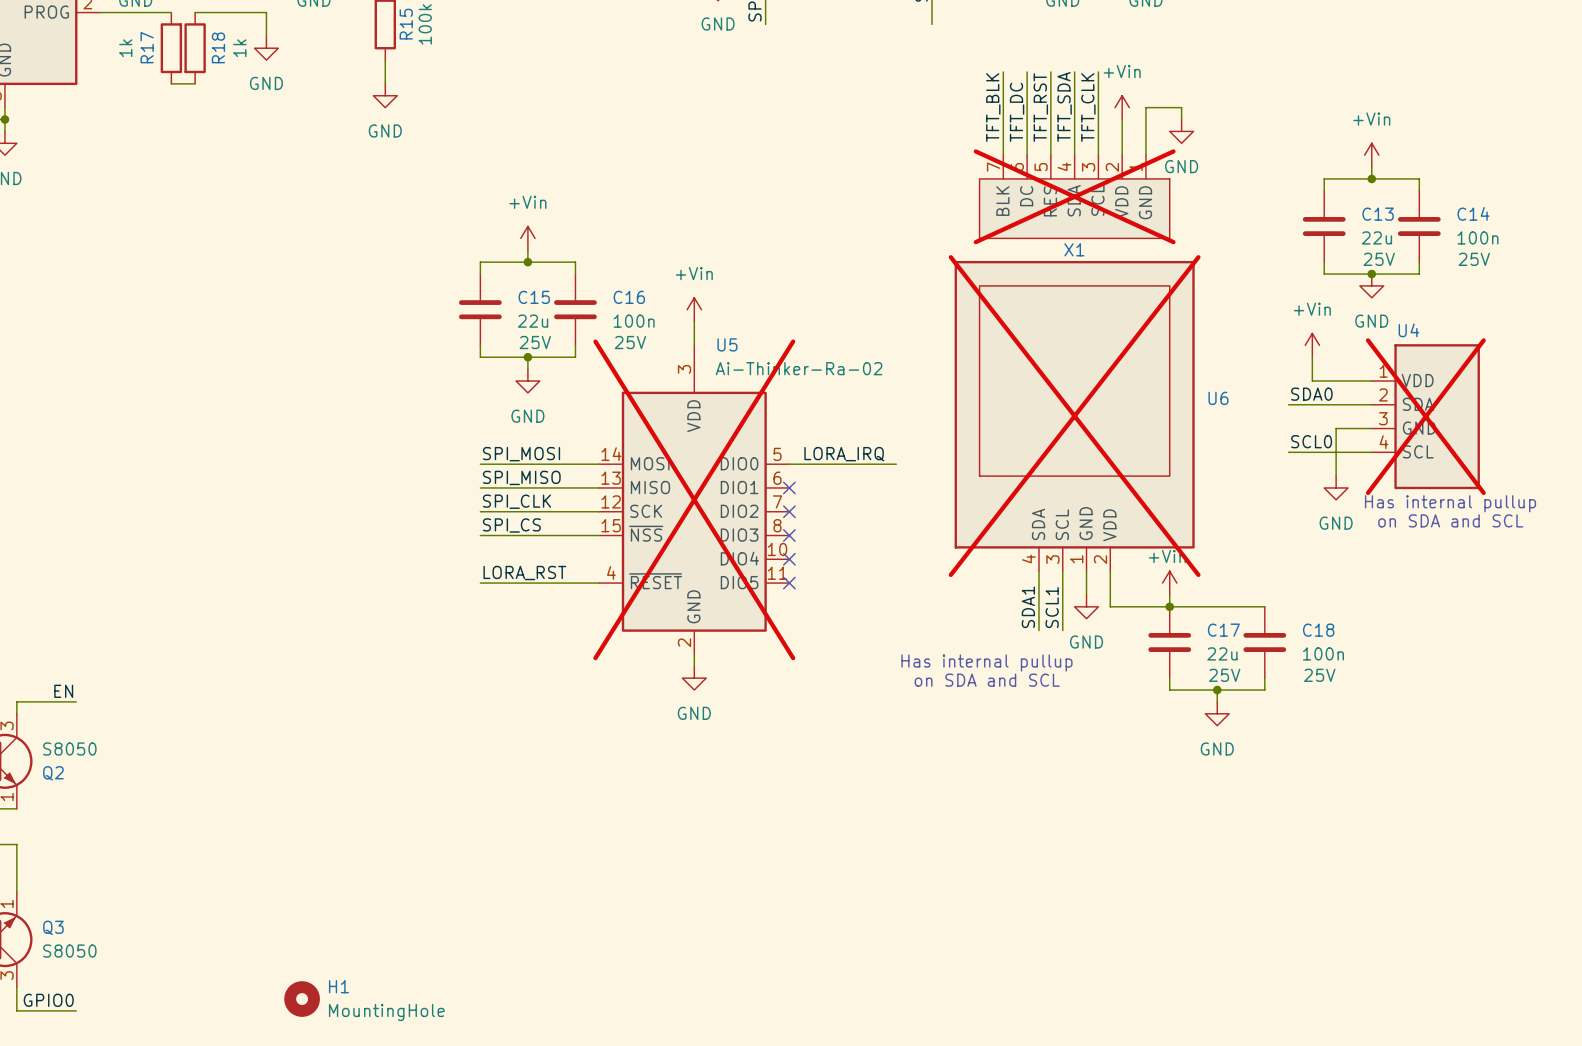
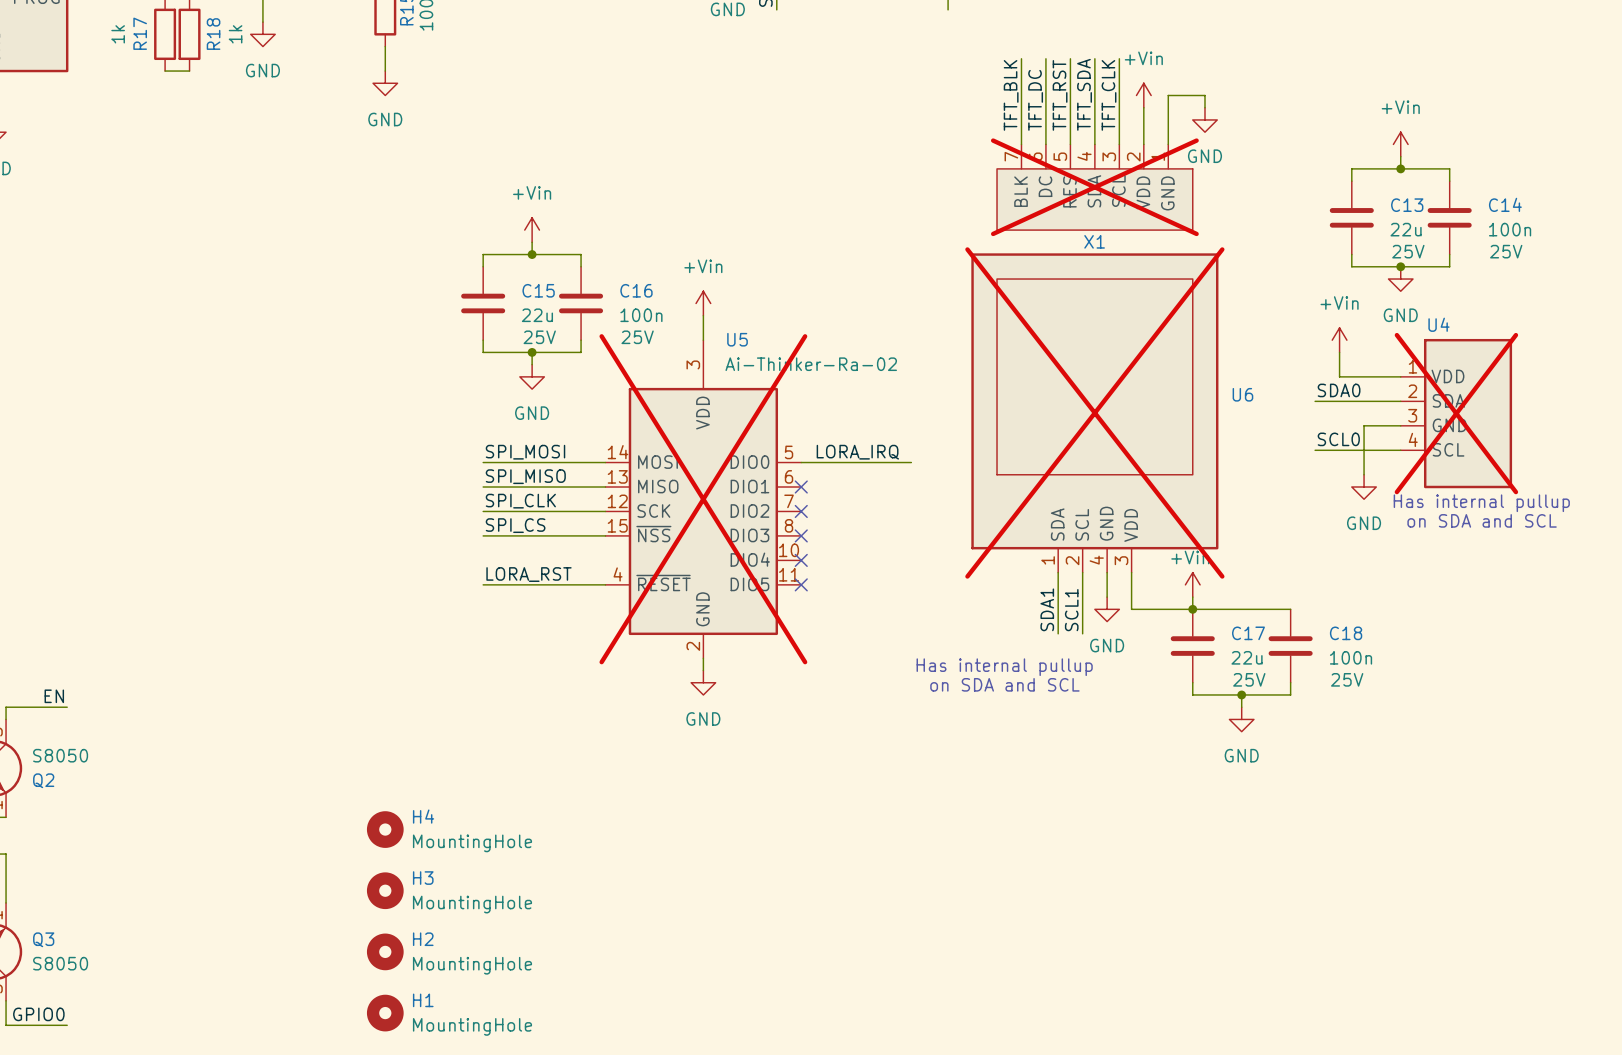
U6 pin number: 4 (1028, 559) -> 1 (1048, 560)
U6 pin number: 3 (1052, 559) -> 2 (1072, 560)
U6 pin number: 1 (1076, 559) -> 4 (1096, 560)
U6 pin number: 2 (1100, 559) -> 3 (1121, 560)
H4: none -> MountingHole (385, 829)
H3: none -> MountingHole (385, 890)
H2: none -> MountingHole (385, 951)
H1 position: (302, 999) -> (385, 1013)

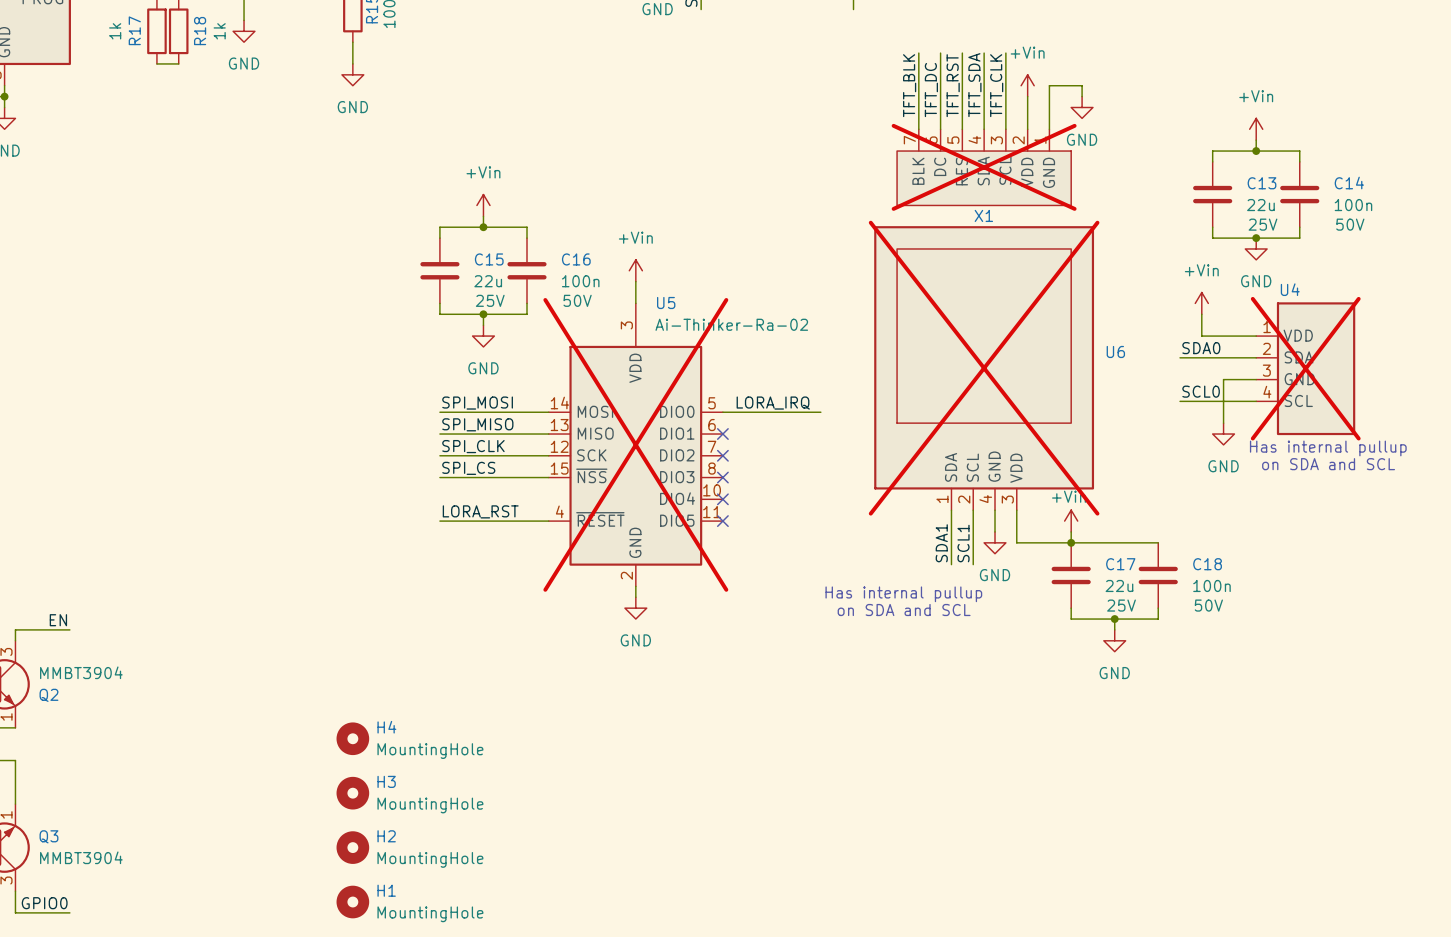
C14 text: 25V (1506, 251) -> 50V (1350, 224)
C16 text: 25V (637, 337) -> 50V (577, 300)
C18 text: 25V (1347, 679) -> 50V (1208, 605)
Q2 value: S8050 (60, 755) -> MMBT3904 (81, 672)
Q3 value: S8050 (60, 963) -> MMBT3904 (81, 857)

